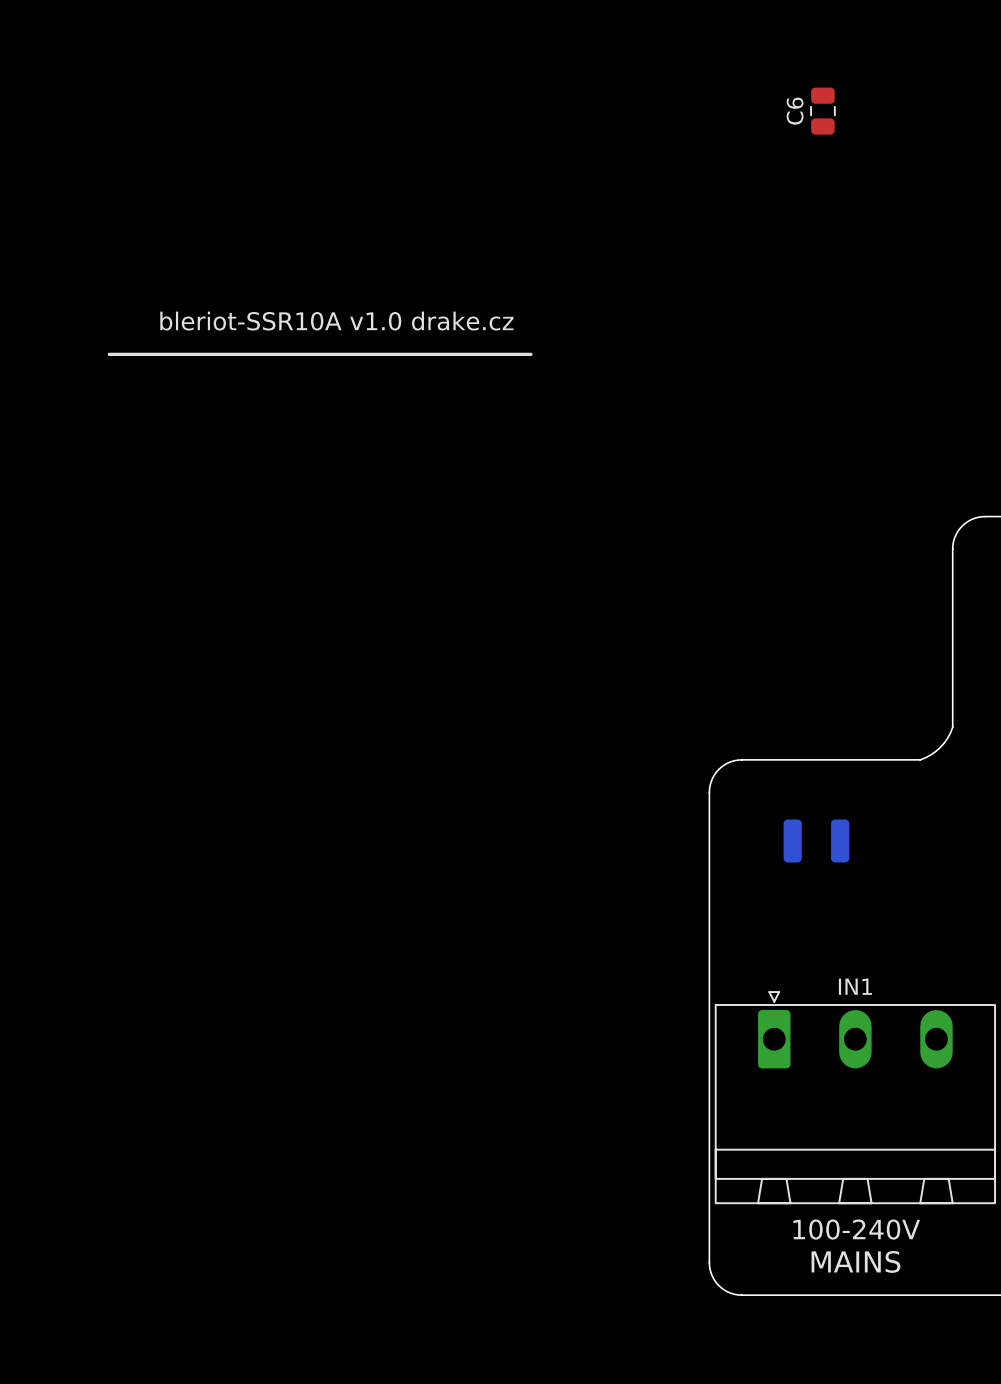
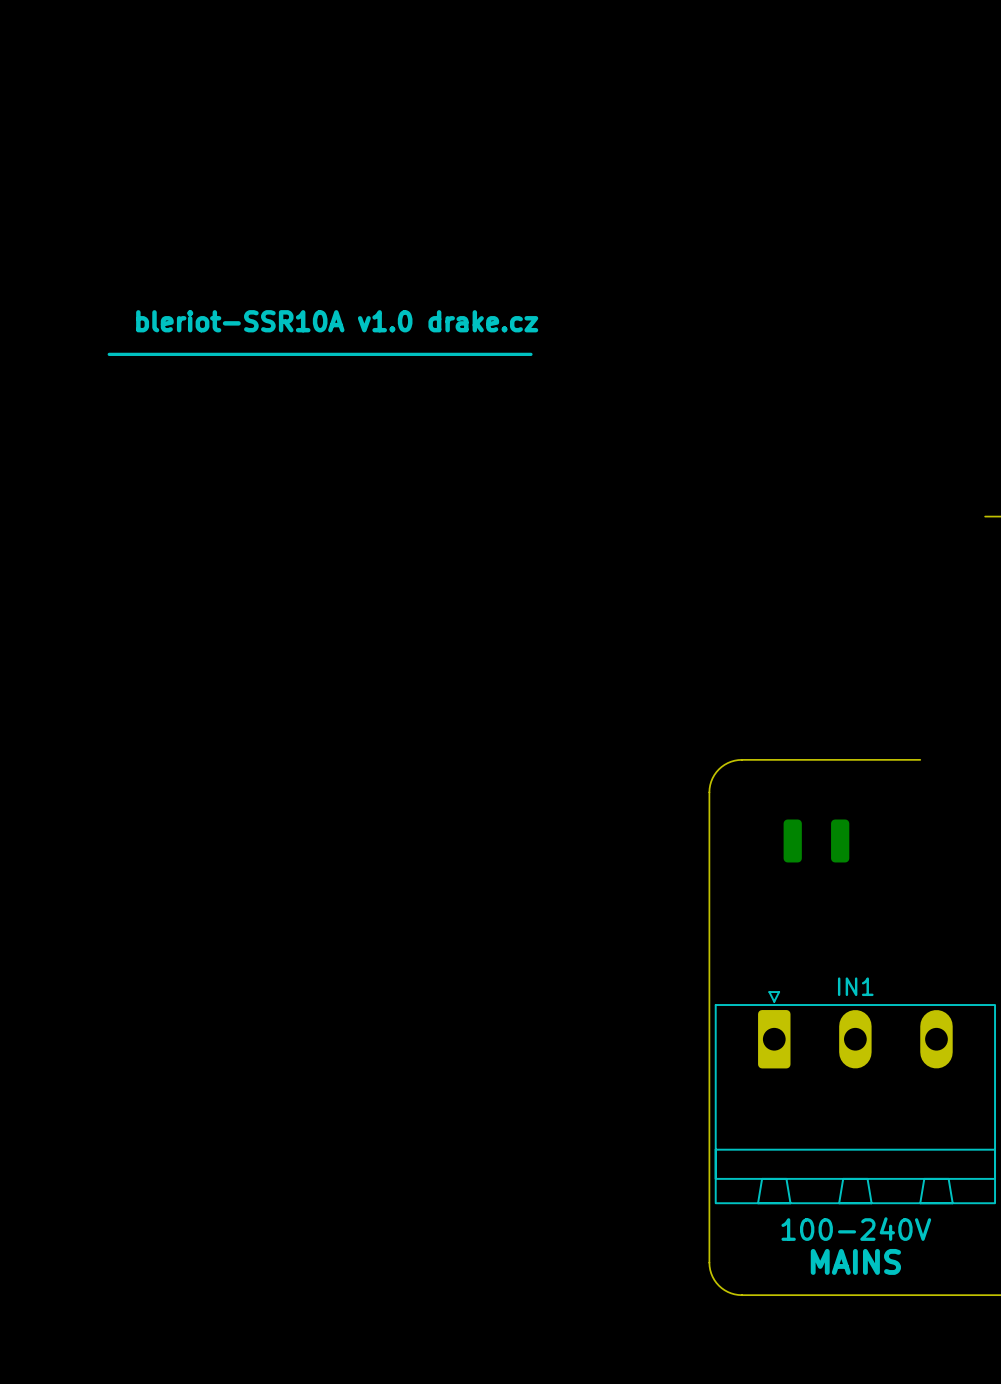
C6: (822, 111) -> none
board edge: (985, 516) (974, 518) (964, 523) (957, 531) (953, 541) (952, 727) (940, 747) (920, 759) -> none

